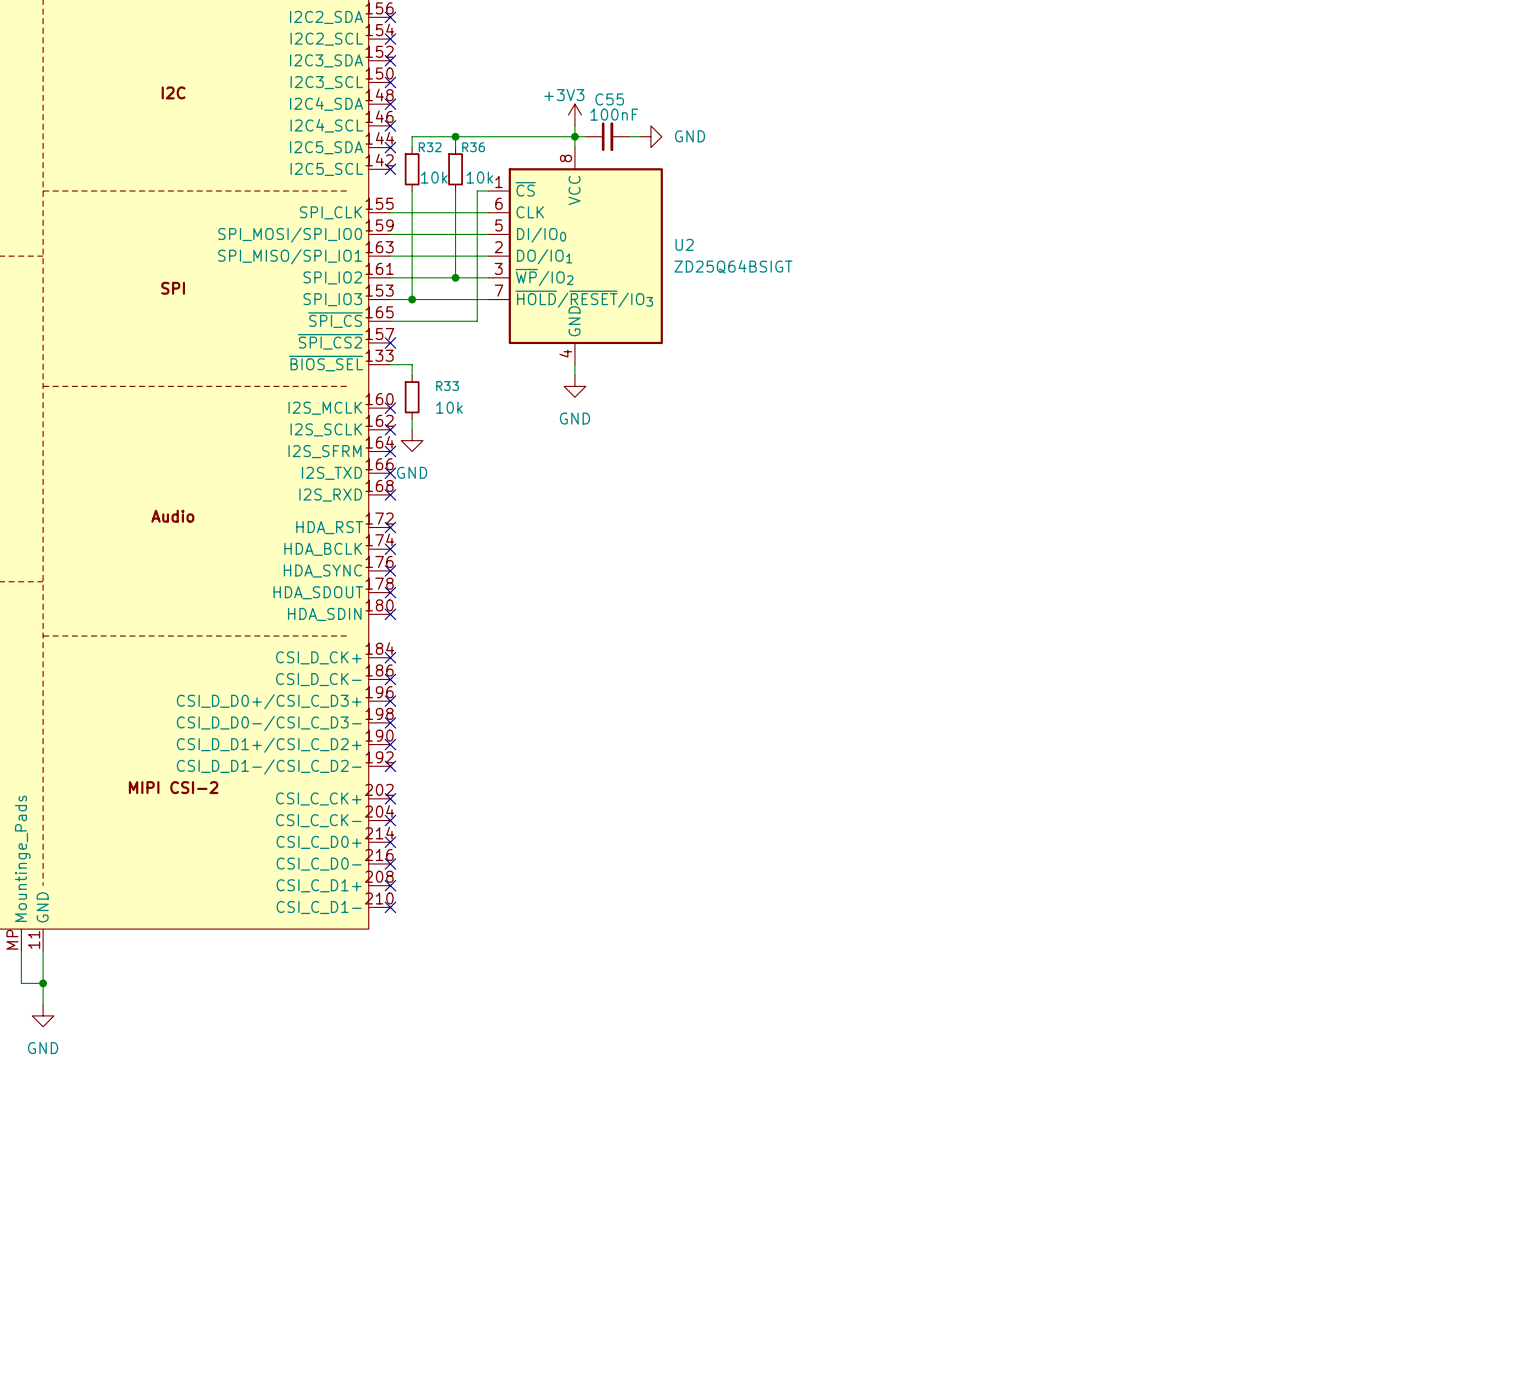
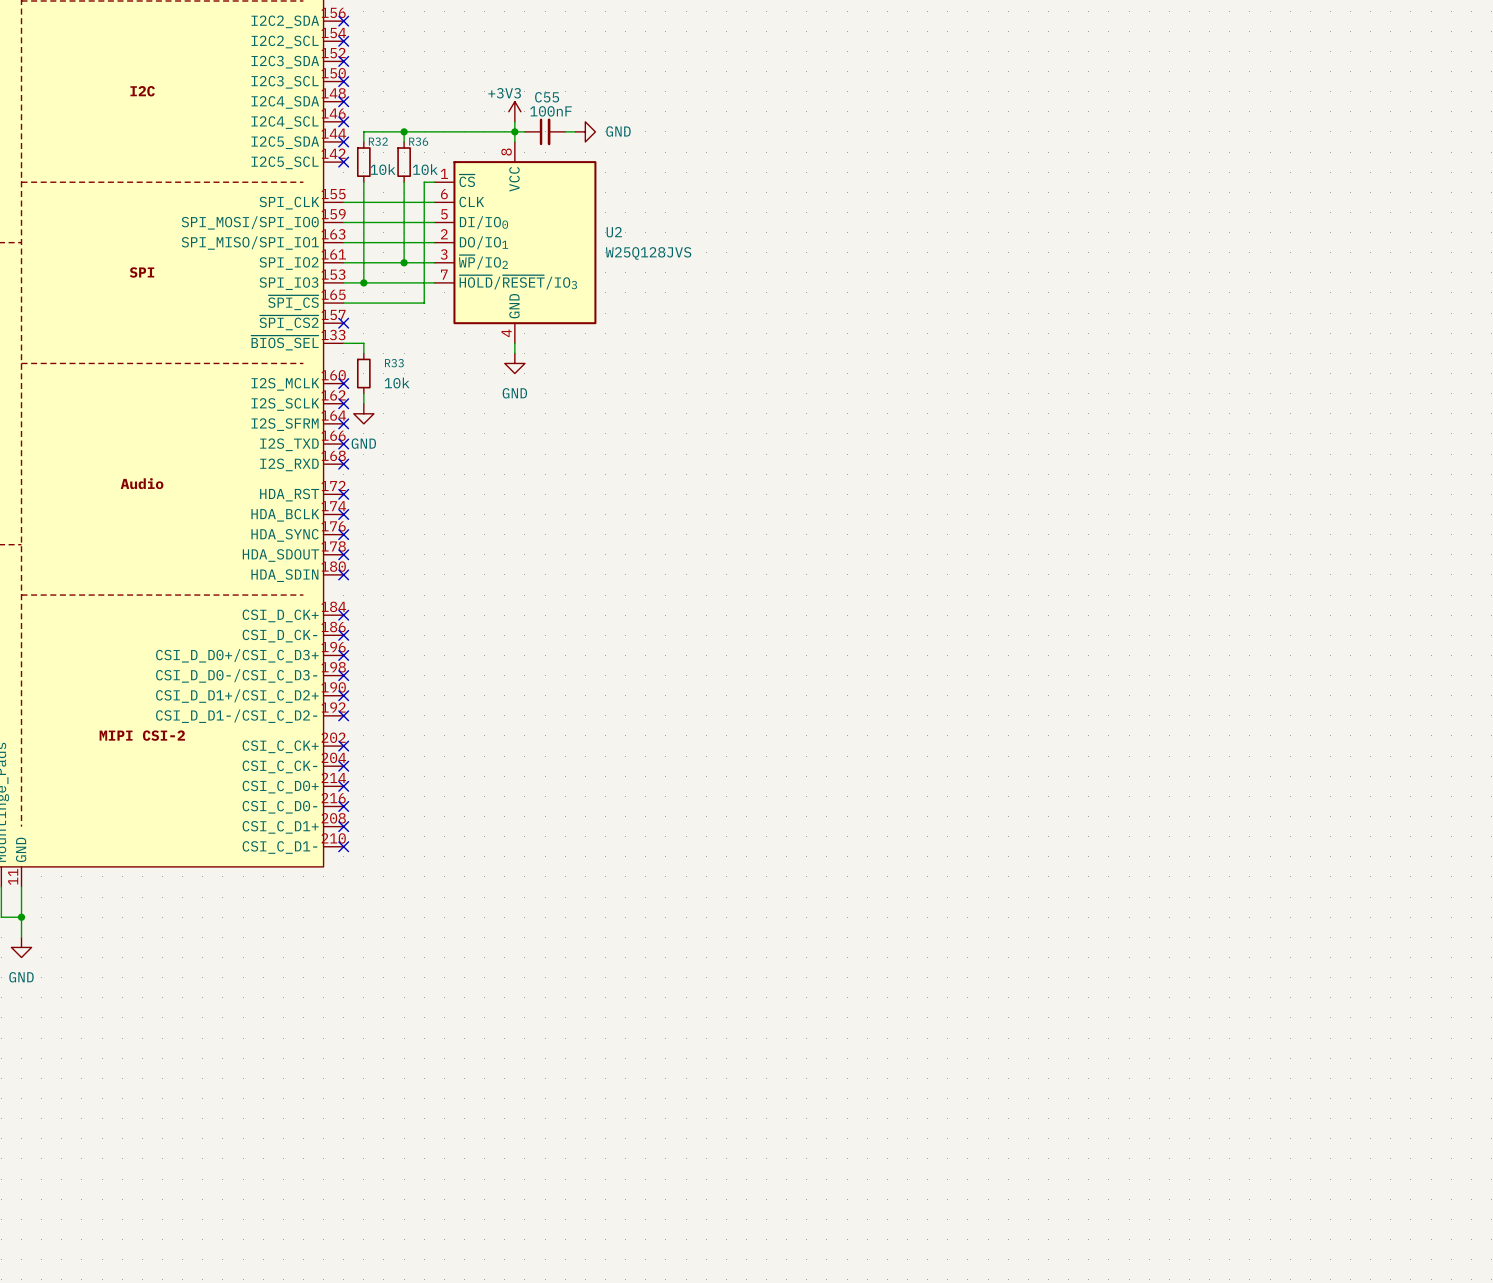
U2 value: ZD25Q64BSIGT (733, 266) -> W25Q128JVS (648, 253)

